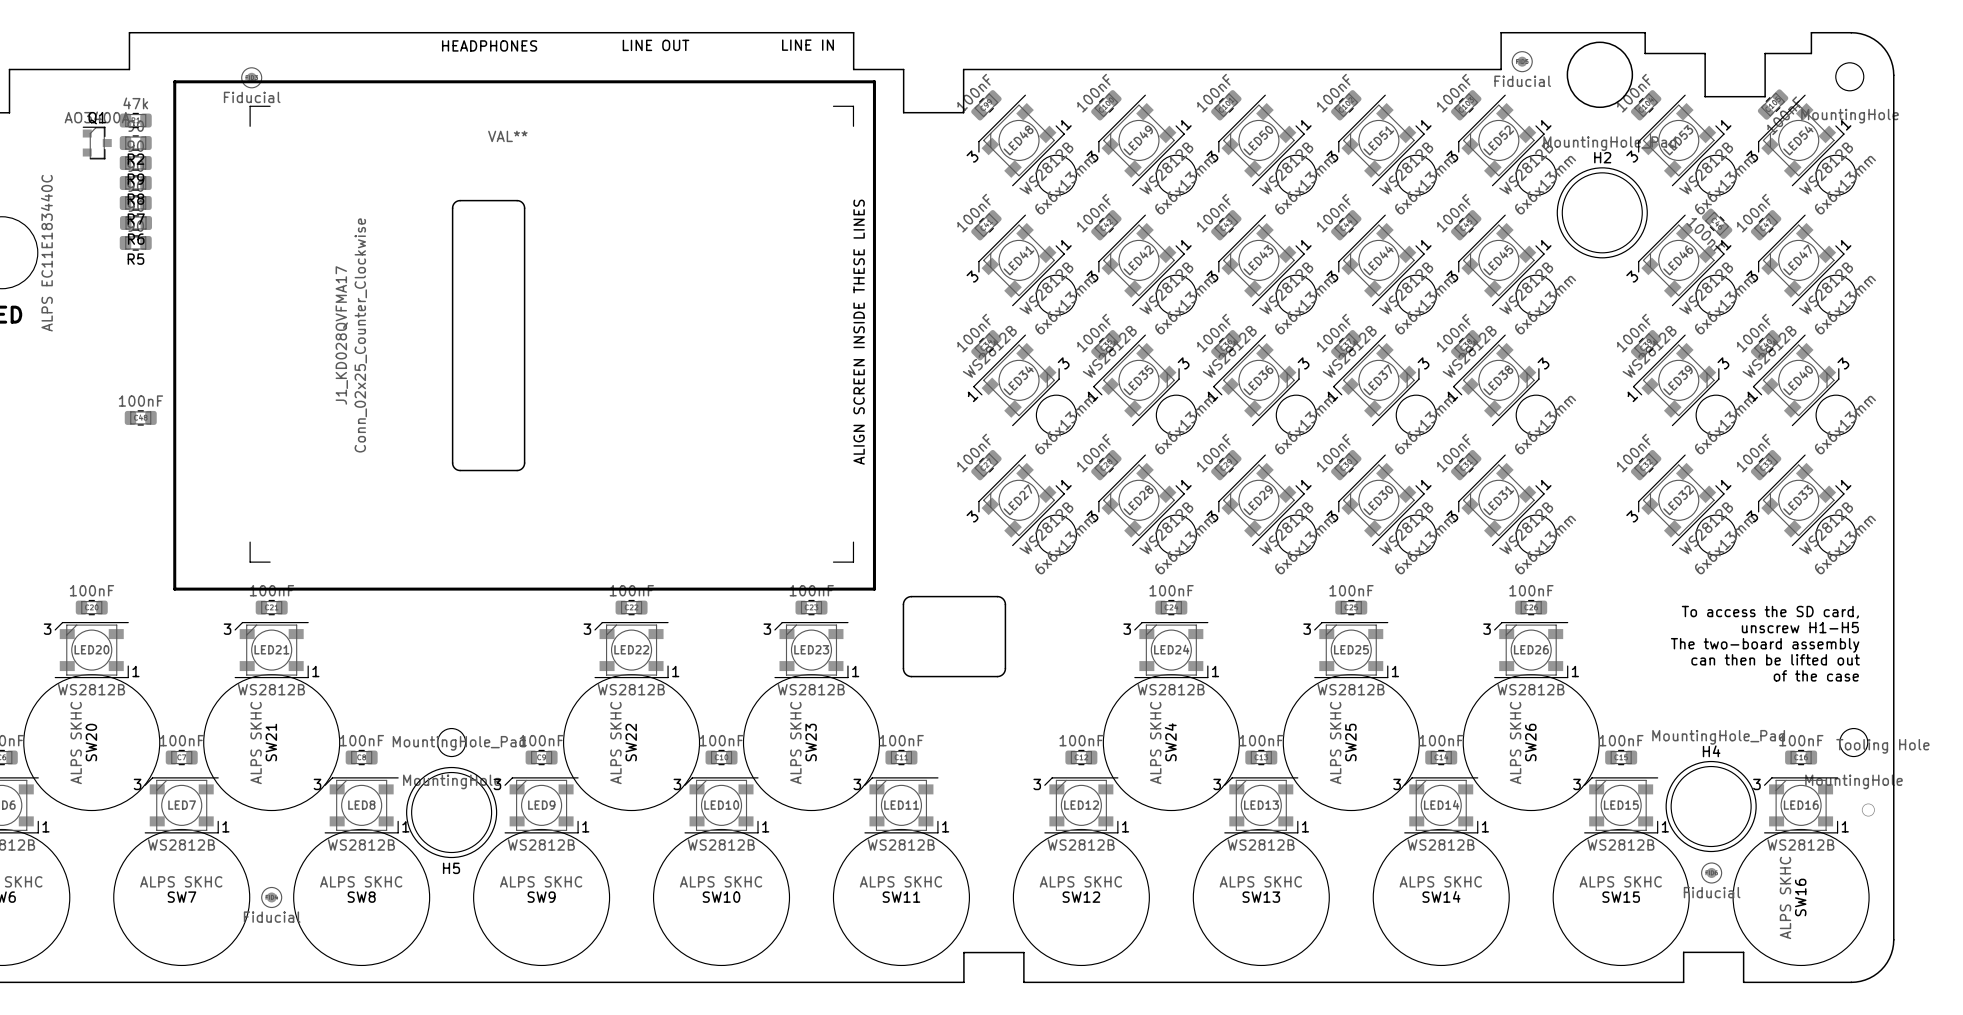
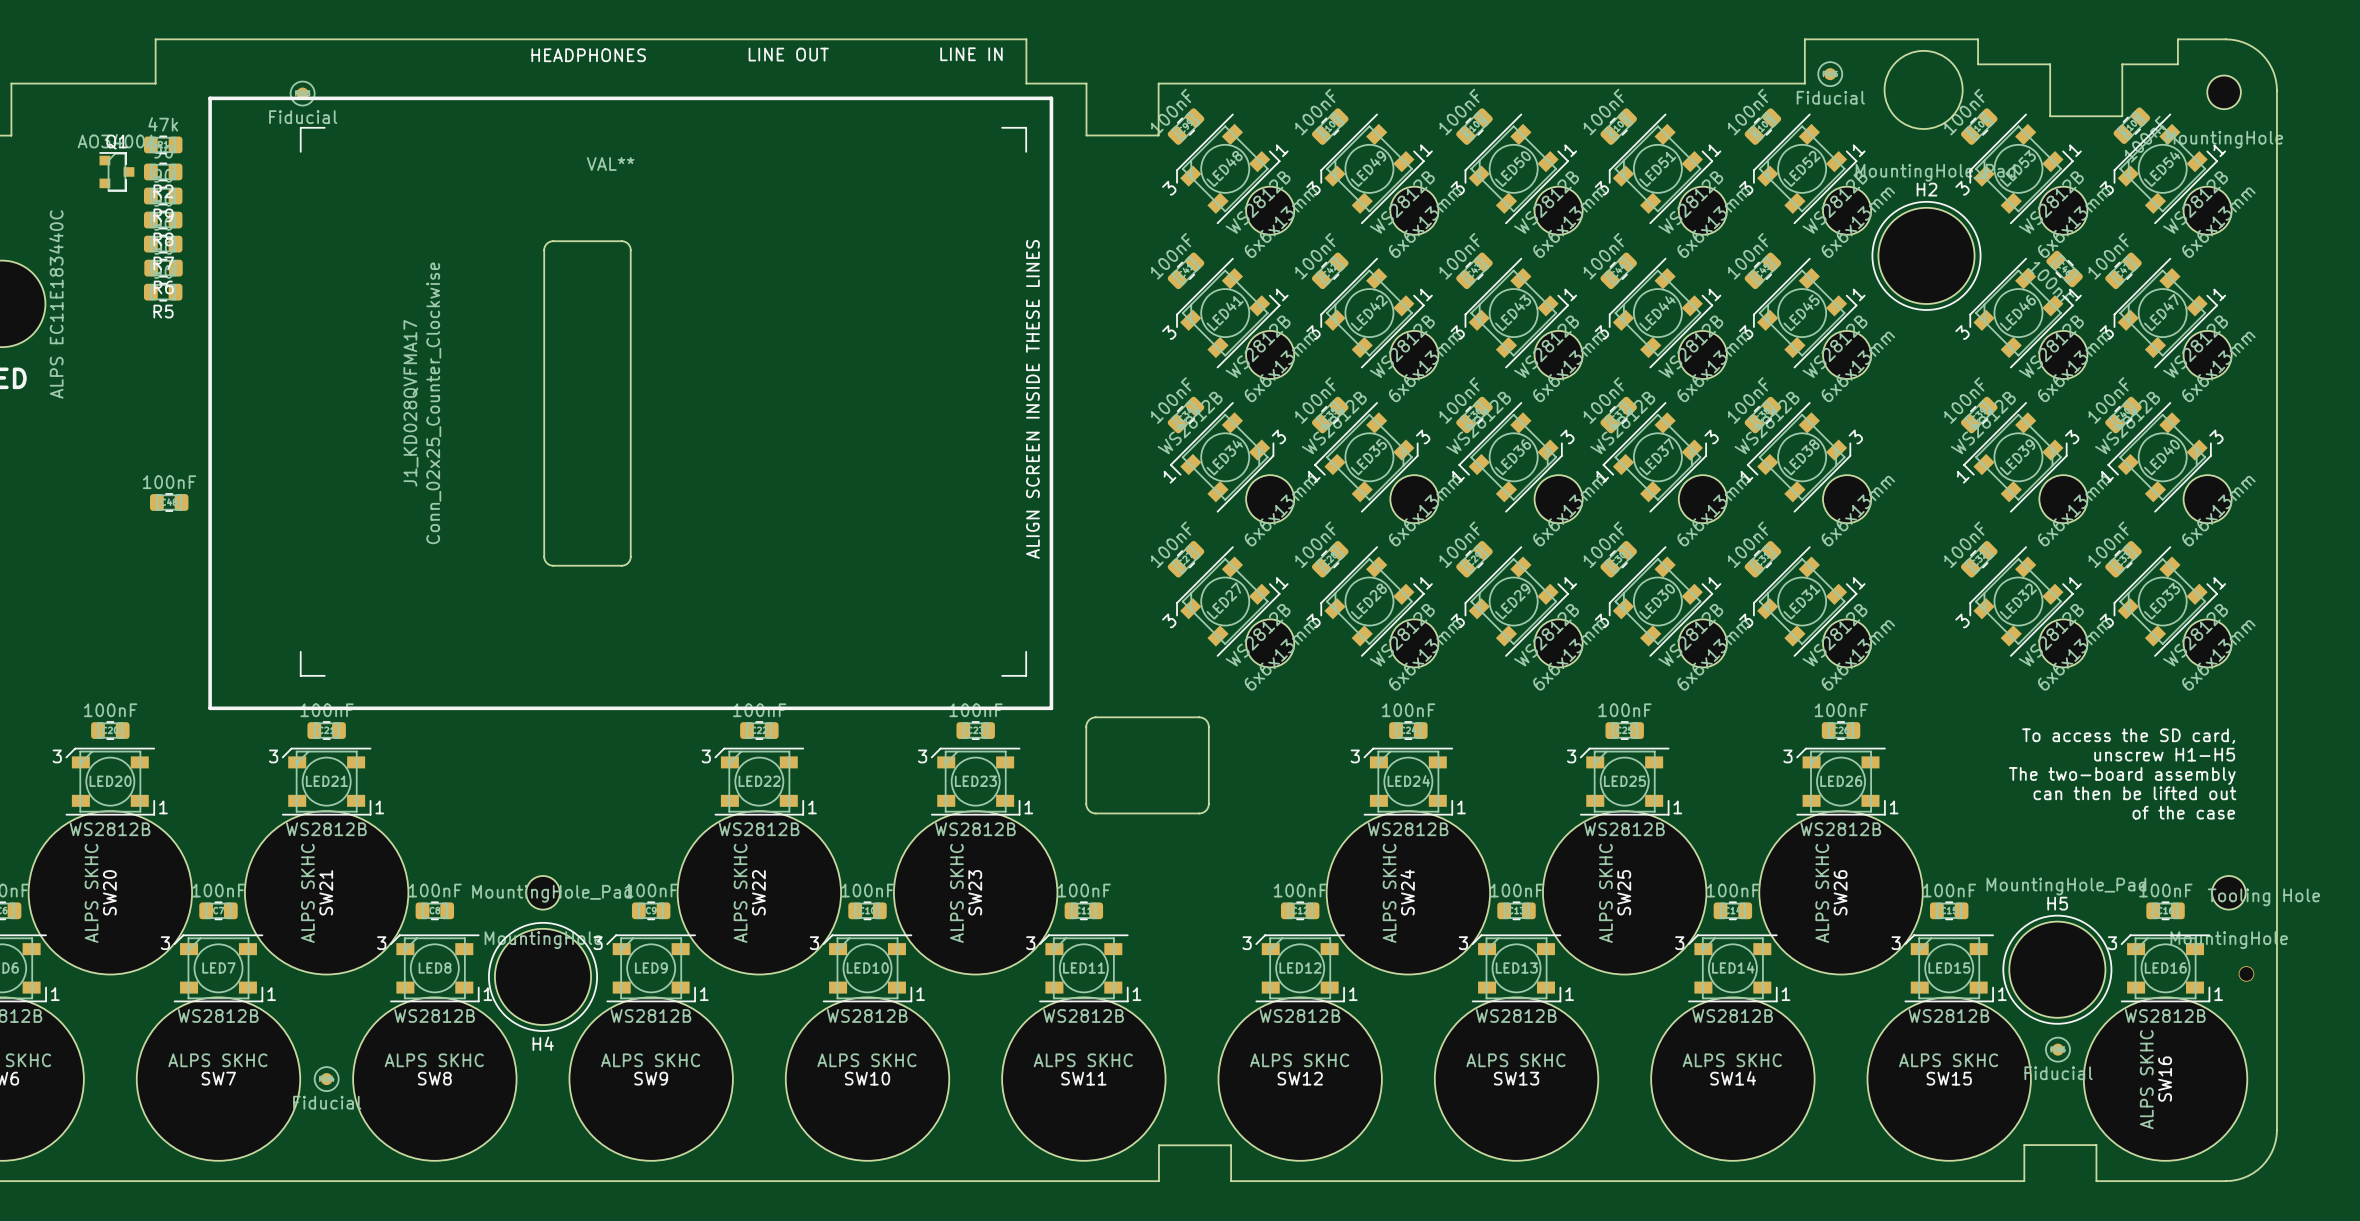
H4 name: H4 (1711, 751) -> H5 (2057, 903)
H5 name: H5 (451, 868) -> H4 (543, 1043)

